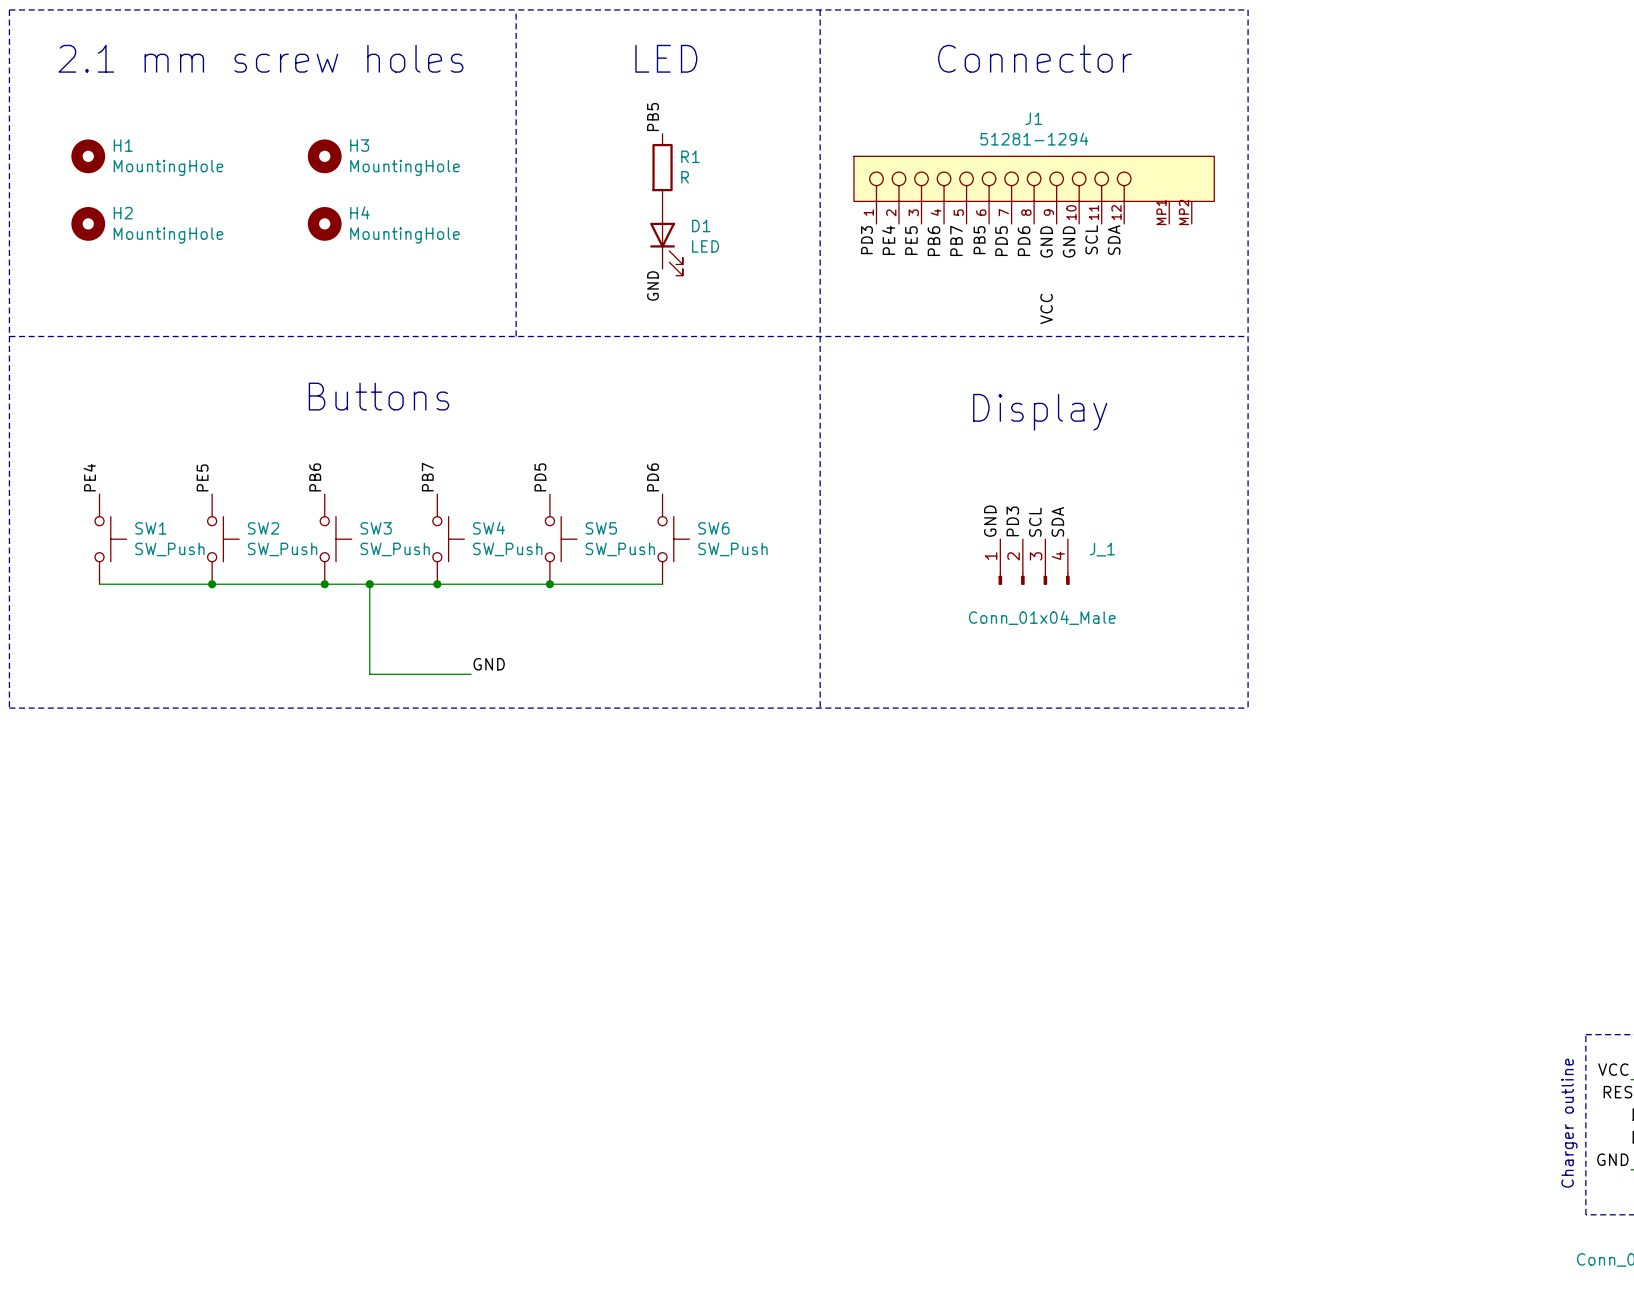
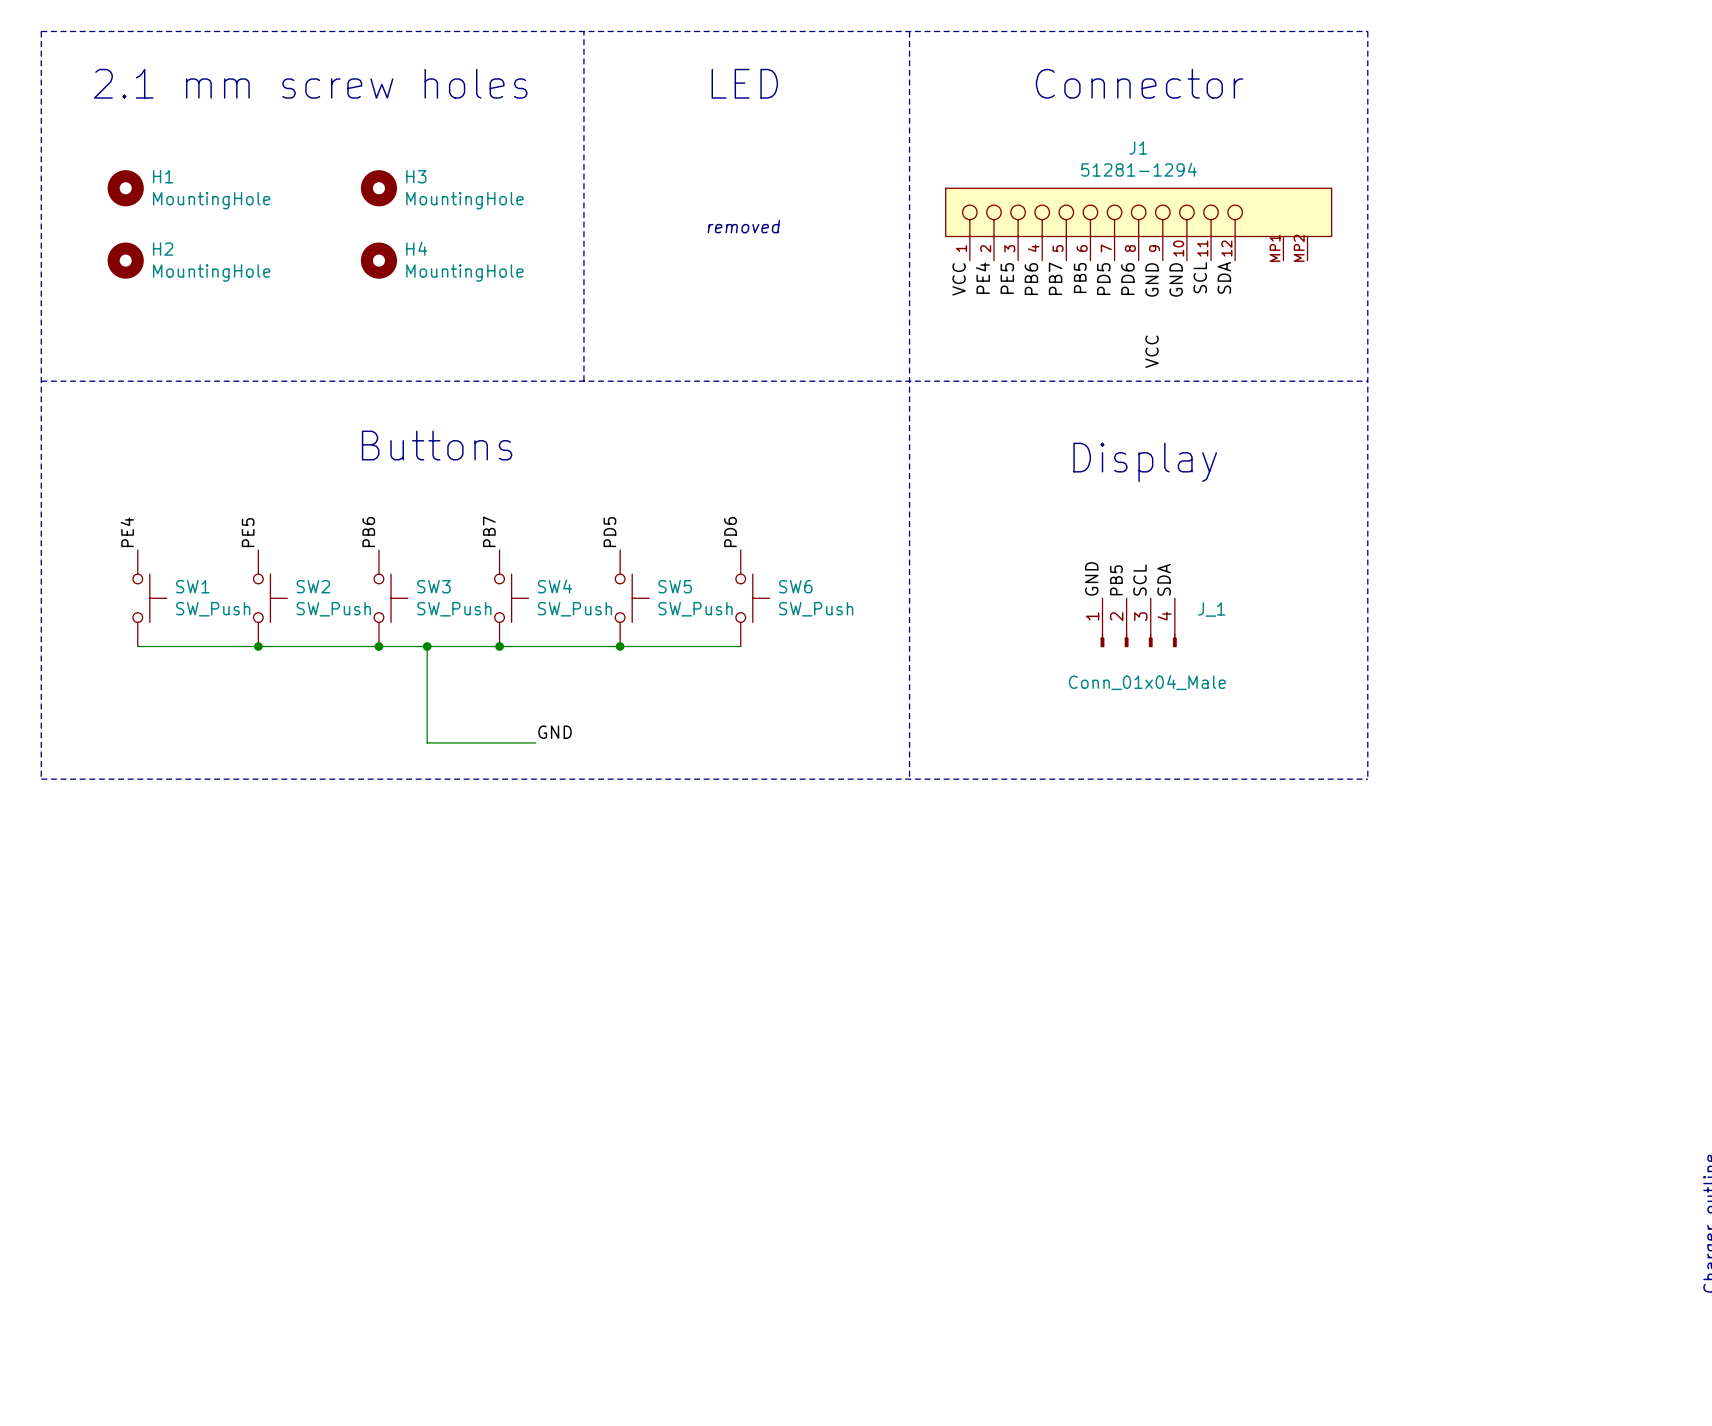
label: PB5 (653, 117) -> none
R1: R (662, 167) -> none
text: none -> removed (743, 226)
D1: LED (666, 238) -> none
label: PD3 (866, 240) -> VCC (959, 279)
label: GND (653, 285) -> none
label: PD3 (1012, 521) -> PB5 (1116, 580)

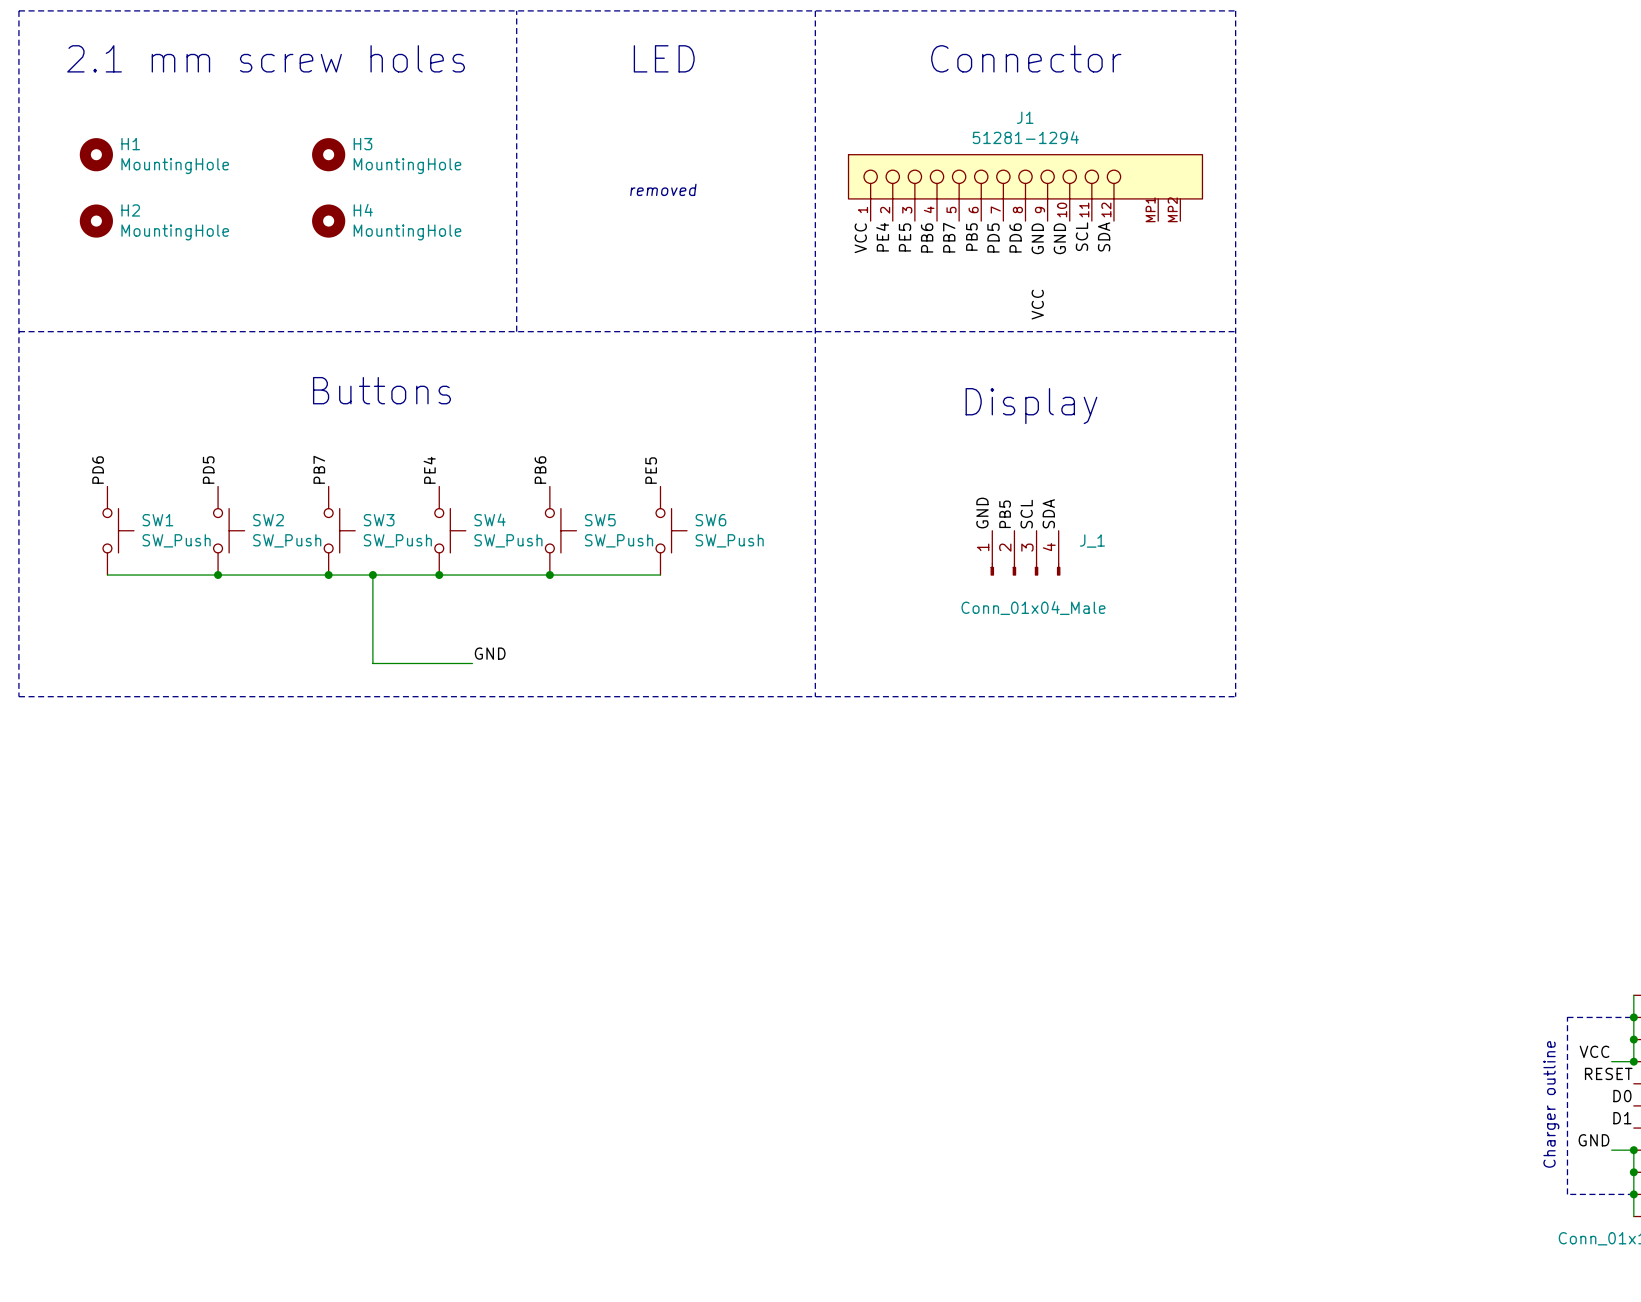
label: PB7 (489, 531) -> PE4 (429, 470)
label: PE4 (127, 532) -> PD6 (98, 470)
label: PE5 (248, 532) -> PD5 (208, 470)
label: PB6 (368, 532) -> PB7 (319, 469)
label: PD5 (609, 532) -> PB6 (540, 470)
label: PD6 (730, 532) -> PE5 (651, 470)

